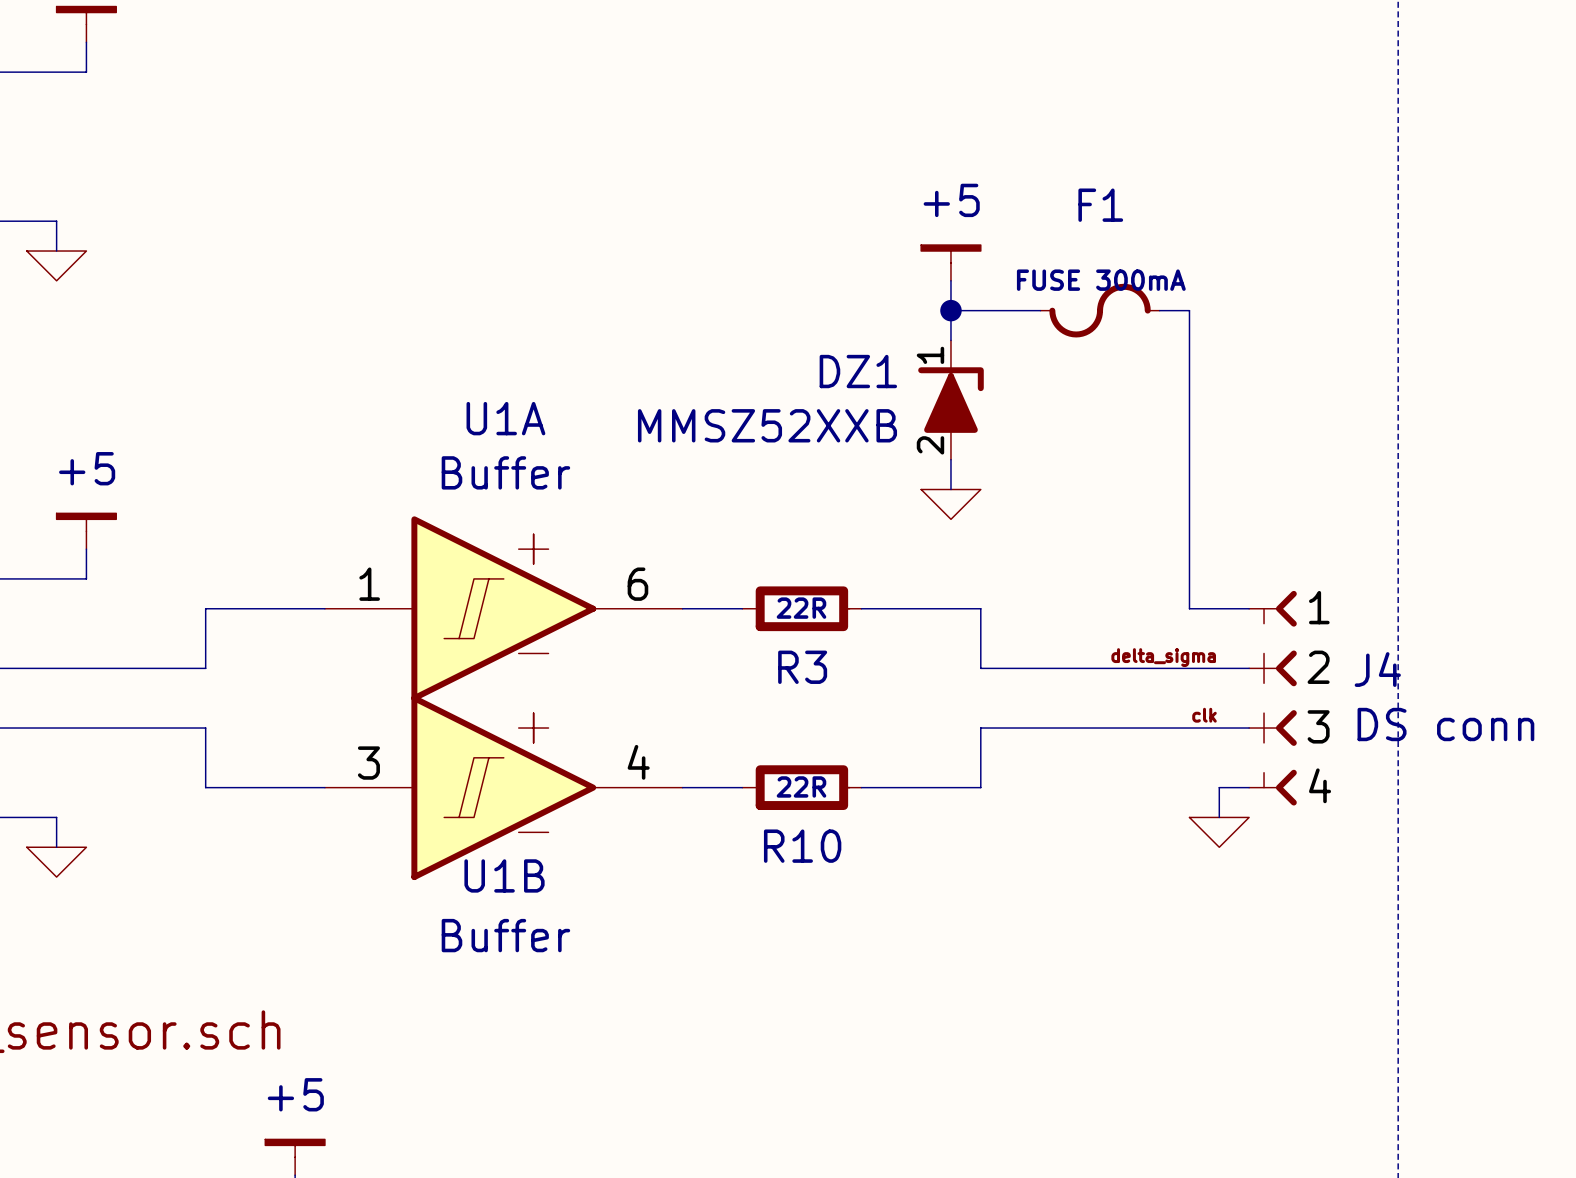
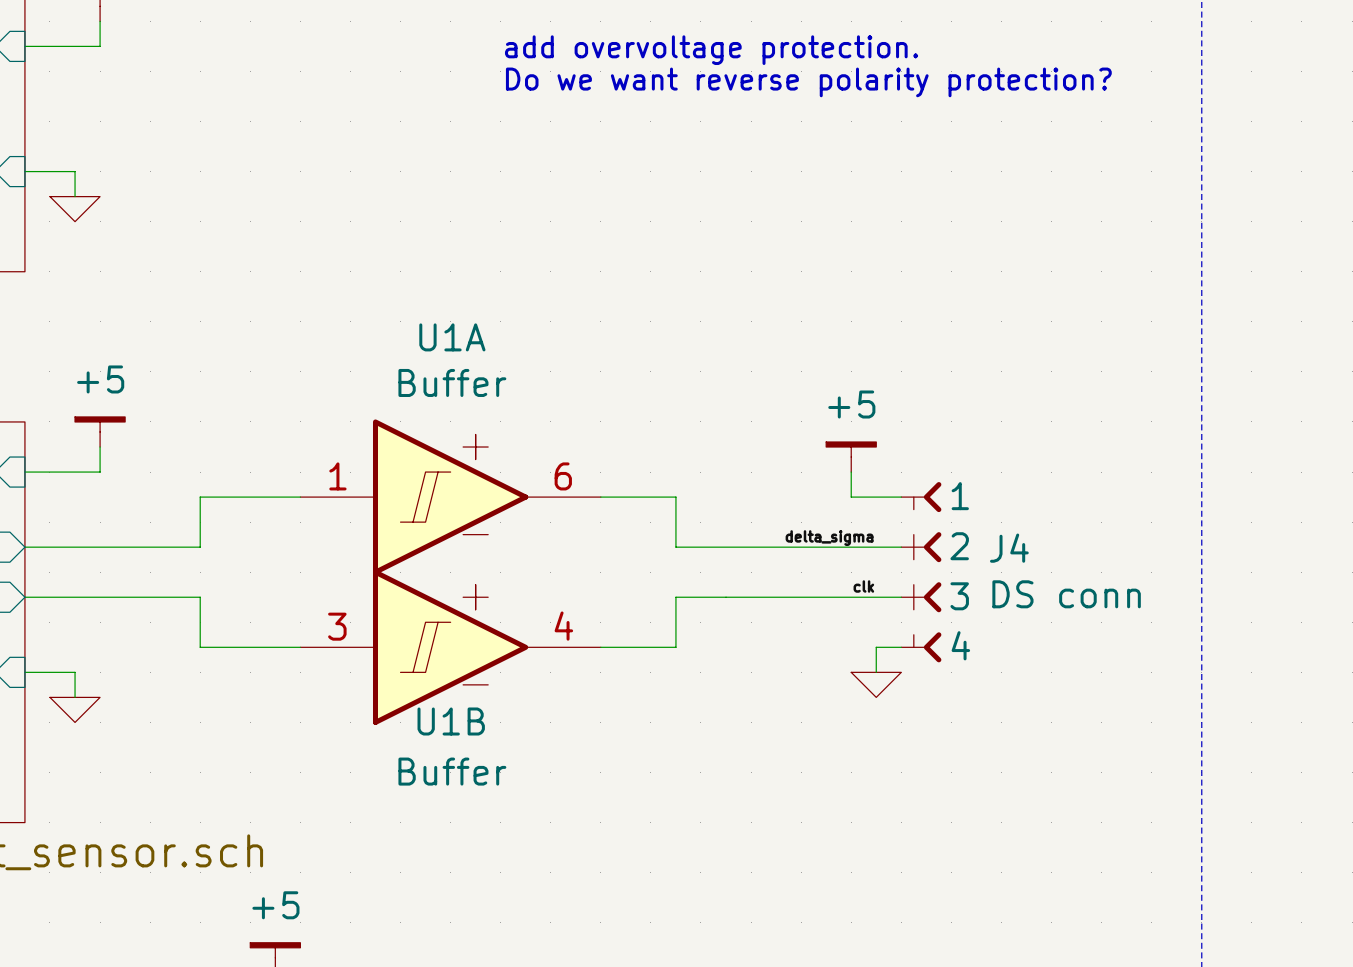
text: none -> add overvoltage protection. (711, 50)
text: none -> Do we want reverse polarity protection? (808, 82)
power symbol position: +5 (950, 262) -> +5 (851, 457)
wire: (950, 280) (950, 340) -> none
wire: (950, 310) (1040, 310) -> none
junction: (950, 310) -> none
F1: FUSE 300mA (1100, 310) -> none
wire: (1159, 310) (1189, 310) (1189, 608) (1249, 608) -> none
DZ1: MMSZ52XXB (950, 400) -> none
wire: (950, 459) (950, 489) -> none
power symbol: (950, 504) -> none
wire: none -> (851, 472) (851, 497) (901, 497)
R3: 22R (801, 608) -> none
wire: (861, 608) (980, 608) (980, 668) -> (650, 497) (675, 497) (675, 547) (851, 547)
label position: delta_sigma (1163, 657) -> delta_sigma (829, 538)
wire: (1040, 668) (1249, 668) -> none
J4 position: (1272, 698) -> (921, 572)
label position: clk (1204, 715) -> clk (863, 586)
wire: (980, 728) (980, 787) (861, 787) -> (851, 597) (675, 597) (675, 647) (650, 647)
wire: (1040, 728) (1249, 728) -> none
R10: 22R (801, 787) -> none
wire: (1249, 787) (1219, 787) (1219, 817) -> (901, 647) (876, 647) (876, 672)
power symbol: none -> (876, 684)
power symbol: (1219, 832) -> none

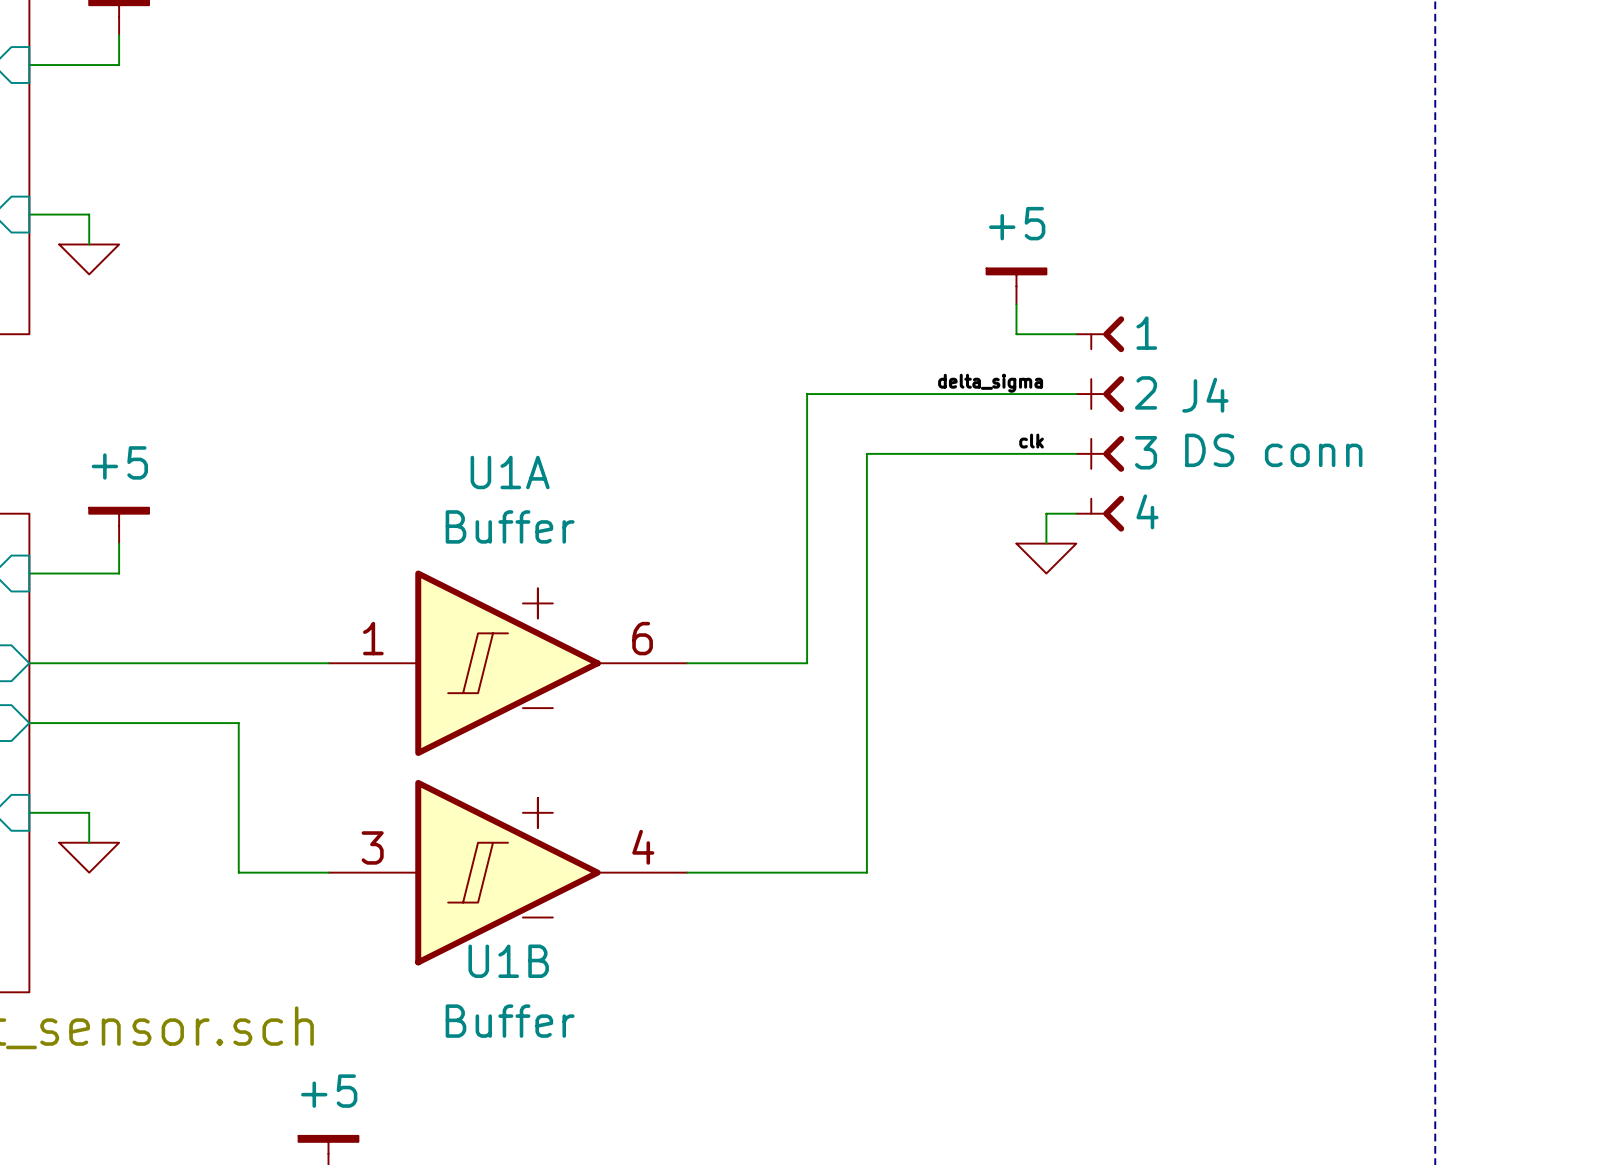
text: add overvoltage protection. (711, 50) -> none
text: Do we want reverse polarity protection? (808, 82) -> none
wire: none -> (1076, 453) (866, 453) (866, 872) (687, 872)
power symbol position: +5 (851, 457) -> +5 (1016, 286)
wire: (851, 472) (851, 497) (901, 497) -> (1016, 304) (1016, 334) (1076, 334)
wire: (300, 497) (200, 497) (200, 547) -> (328, 663) (238, 663)
U1A position: (450, 497) -> (507, 663)
wire: (600, 497) (675, 497) -> (1076, 394) (807, 394) (807, 603)
label position: delta_sigma (829, 538) -> delta_sigma (990, 383)
wire: (675, 547) (901, 547) -> (807, 663) (687, 663)
J4 position: (921, 572) -> (1100, 423)
label position: clk (863, 586) -> clk (1031, 441)
wire: (901, 597) (675, 597) (675, 647) (600, 647) -> none
wire: (200, 647) (300, 647) -> (238, 782) (238, 872) (328, 872)
U1B position: (450, 647) -> (507, 872)
wire: (901, 647) (876, 647) (876, 672) -> (1076, 513) (1046, 513) (1046, 543)
power symbol position: (876, 684) -> (1046, 558)

